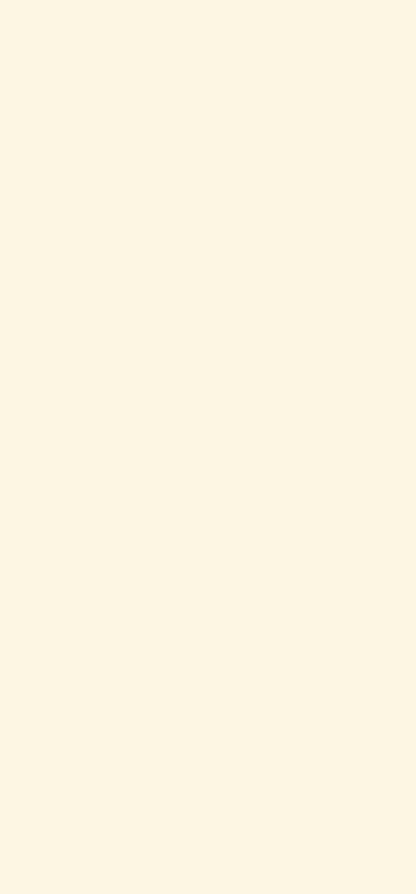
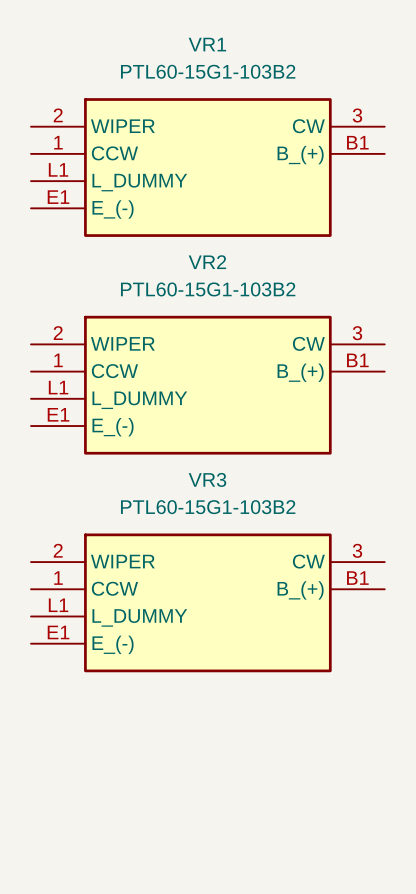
VR1: none -> PTL60-15G1-103B2 (207, 167)
VR2: none -> PTL60-15G1-103B2 (207, 385)
VR3: none -> PTL60-15G1-103B2 (207, 602)

